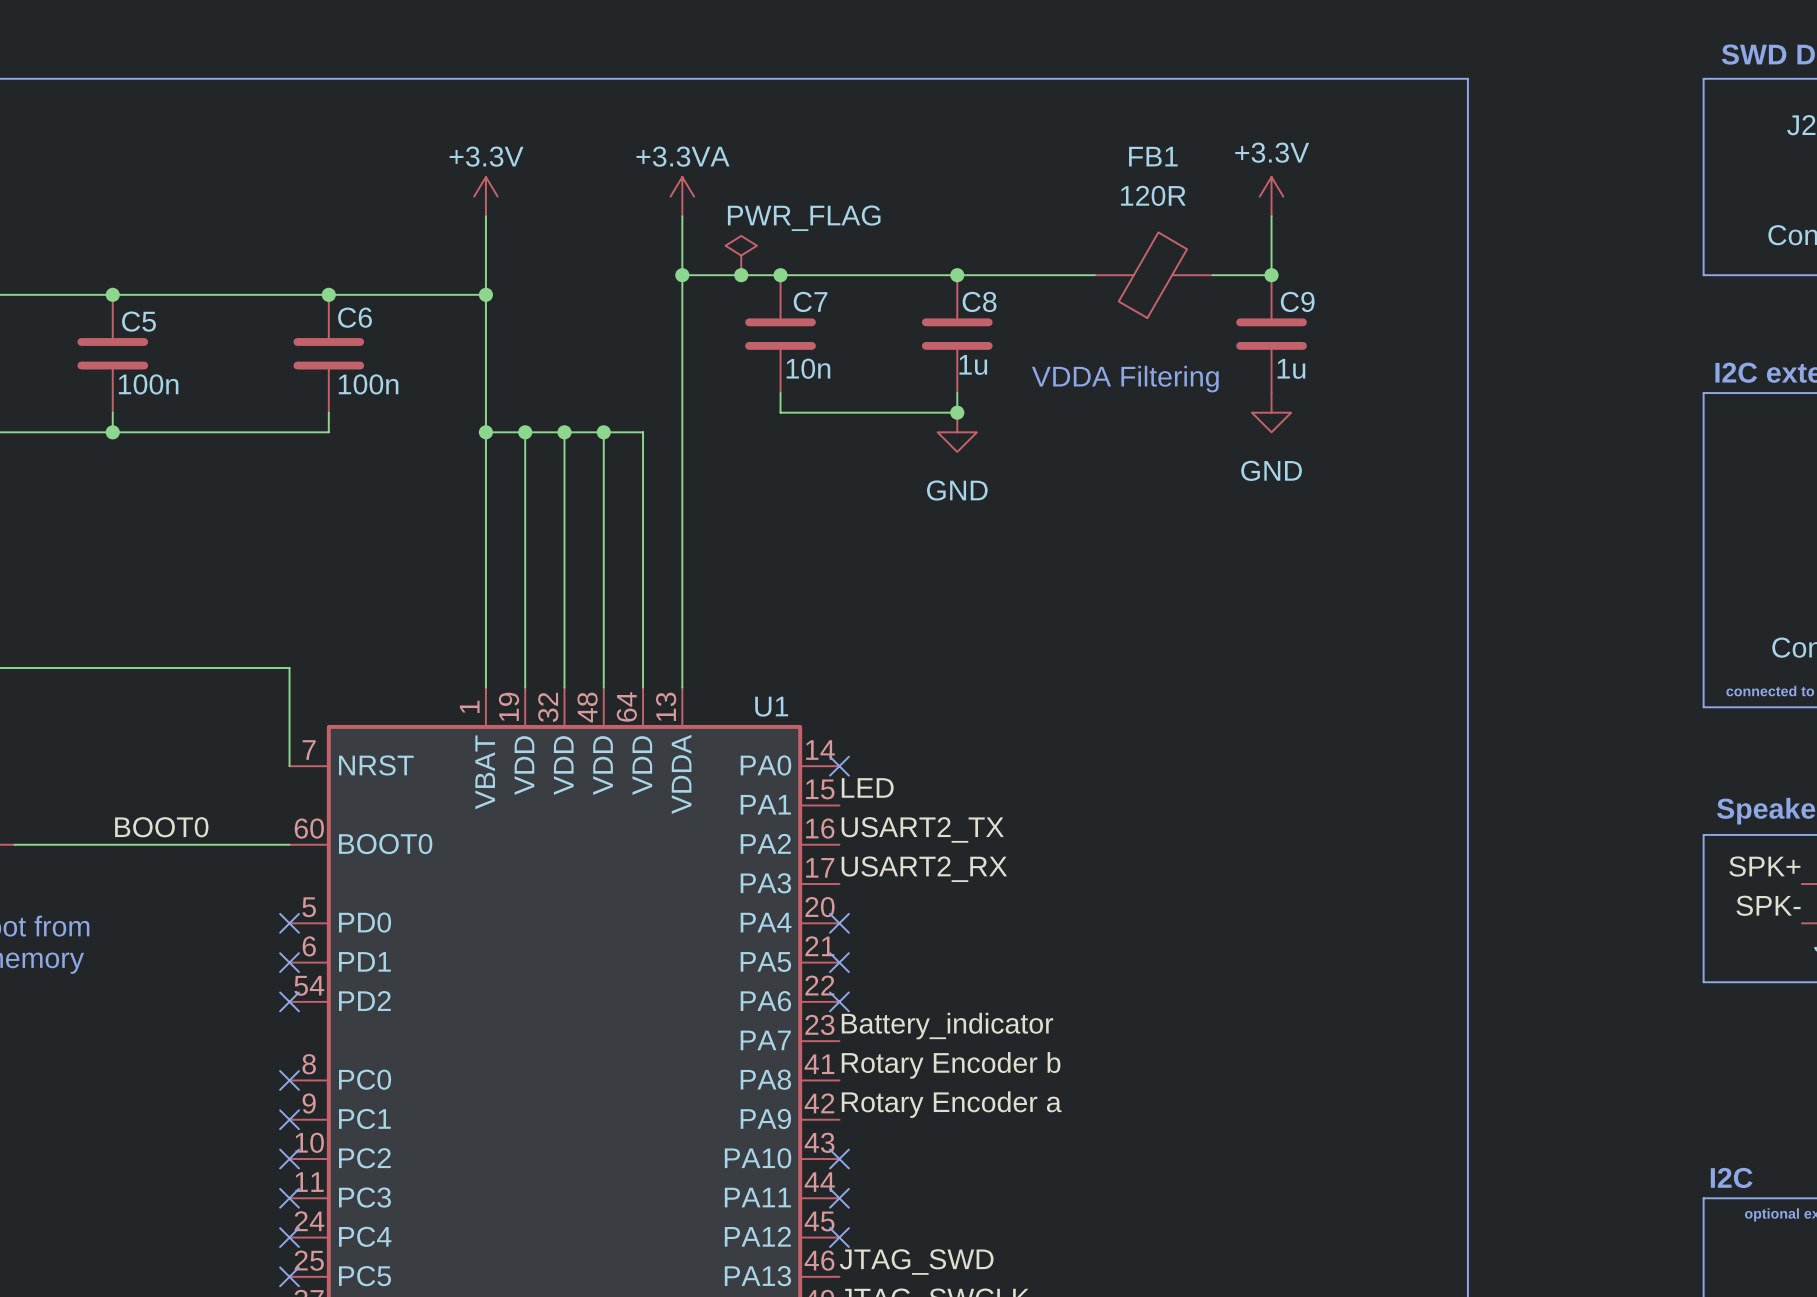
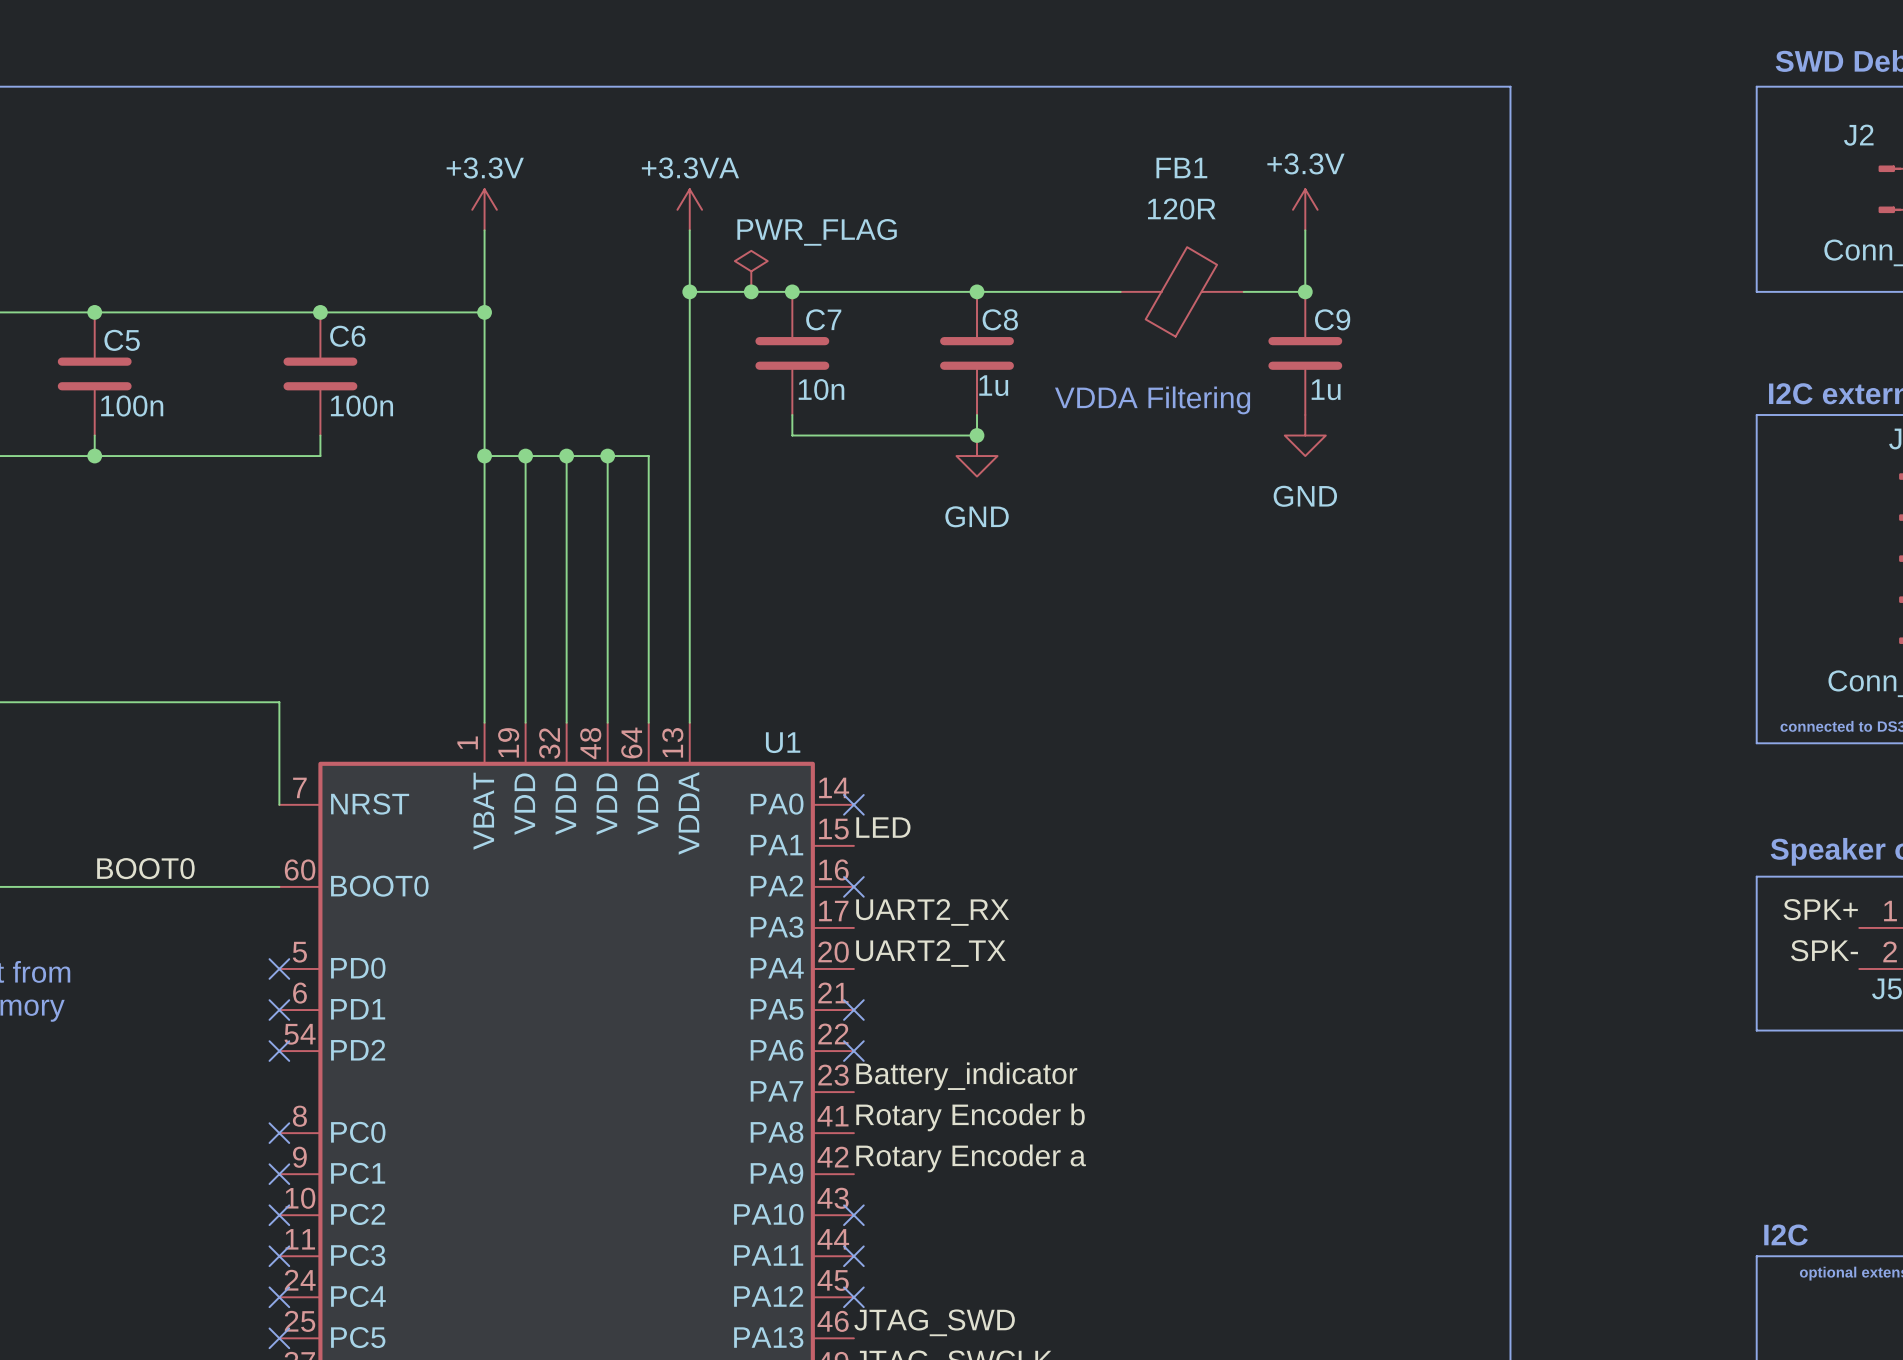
label: USART2_TX (922, 829) -> none
label: USART2_RX (924, 869) -> UART2_RX (932, 912)
label: none -> UART2_TX (930, 953)
no-connect mark position: (839, 923) -> (853, 886)

